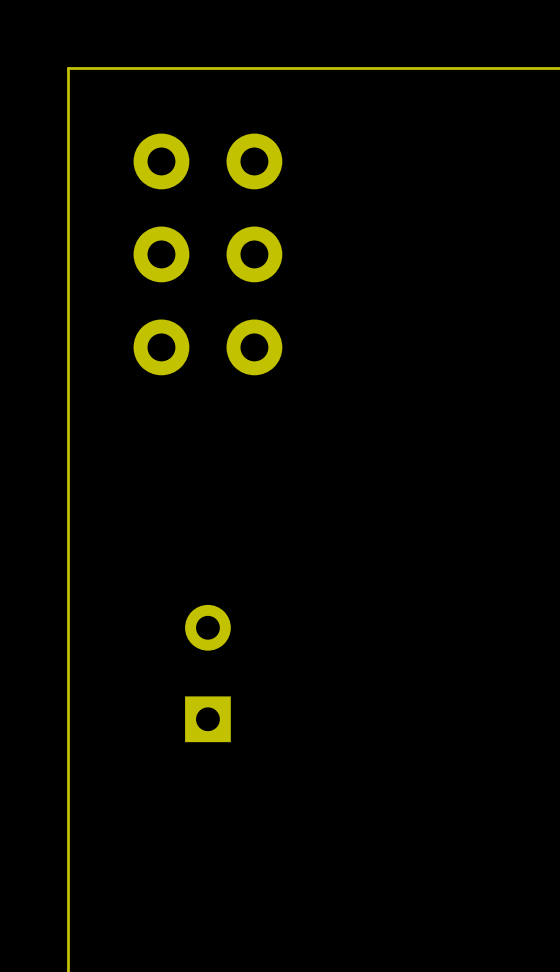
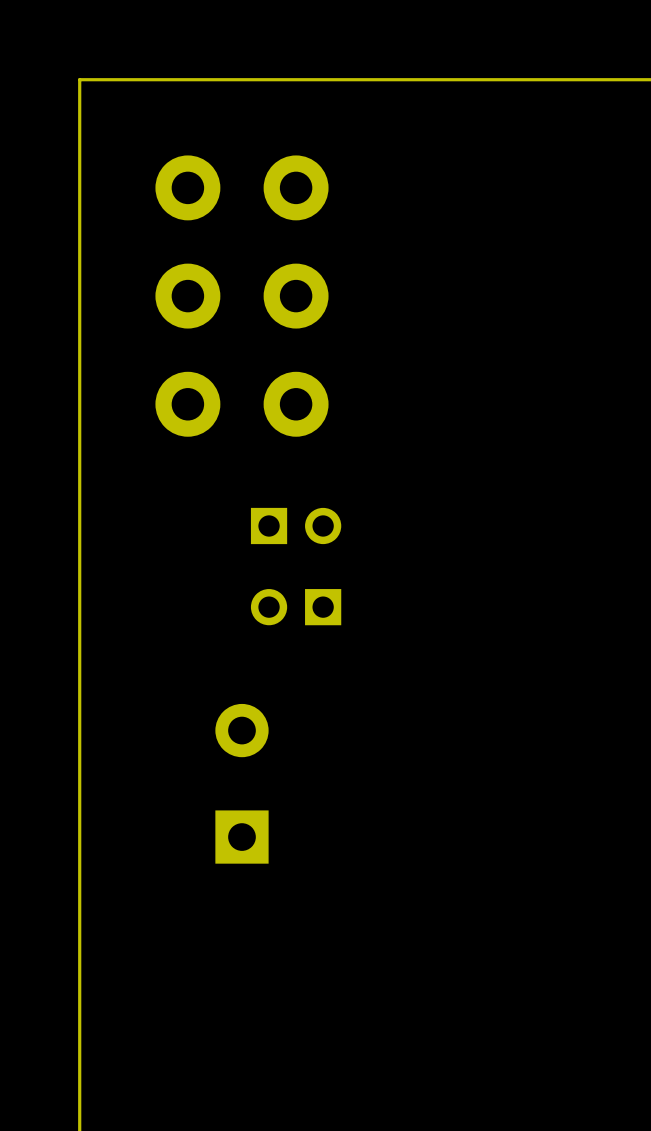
part: none -> (296, 525)
part: none -> (296, 607)

